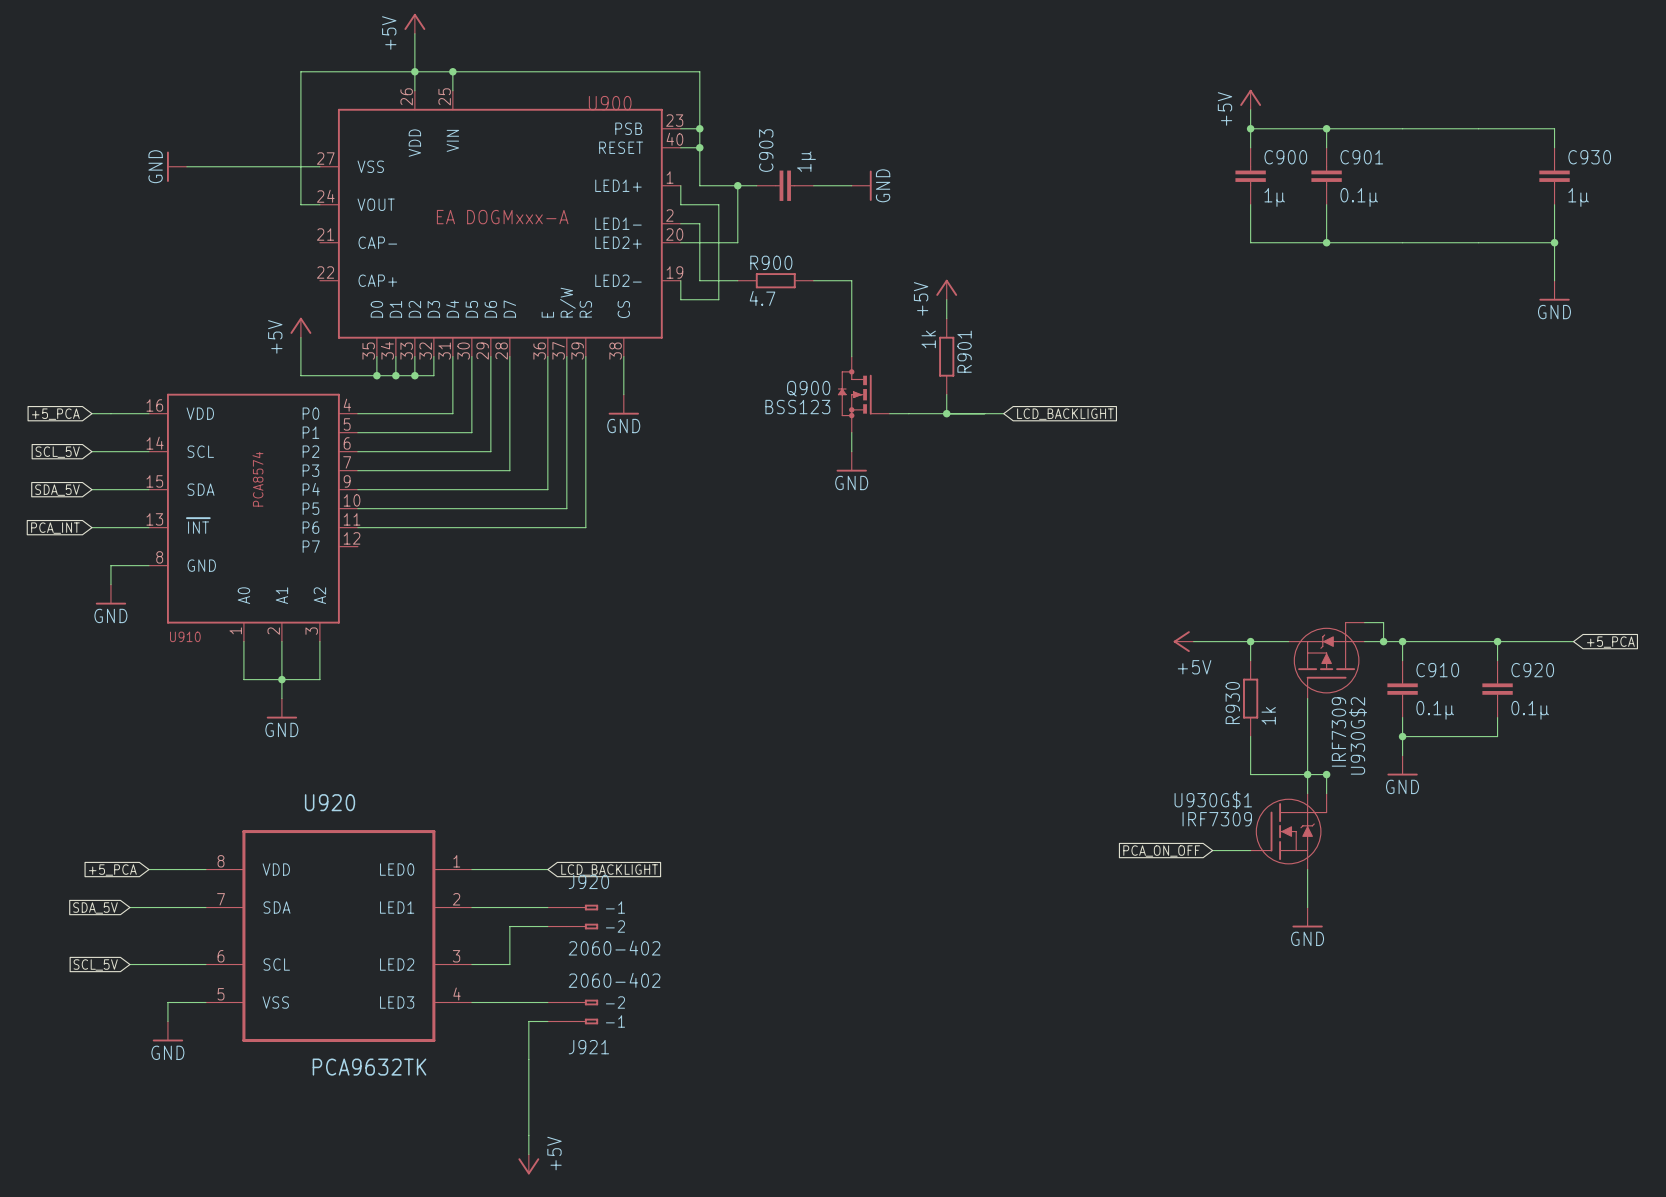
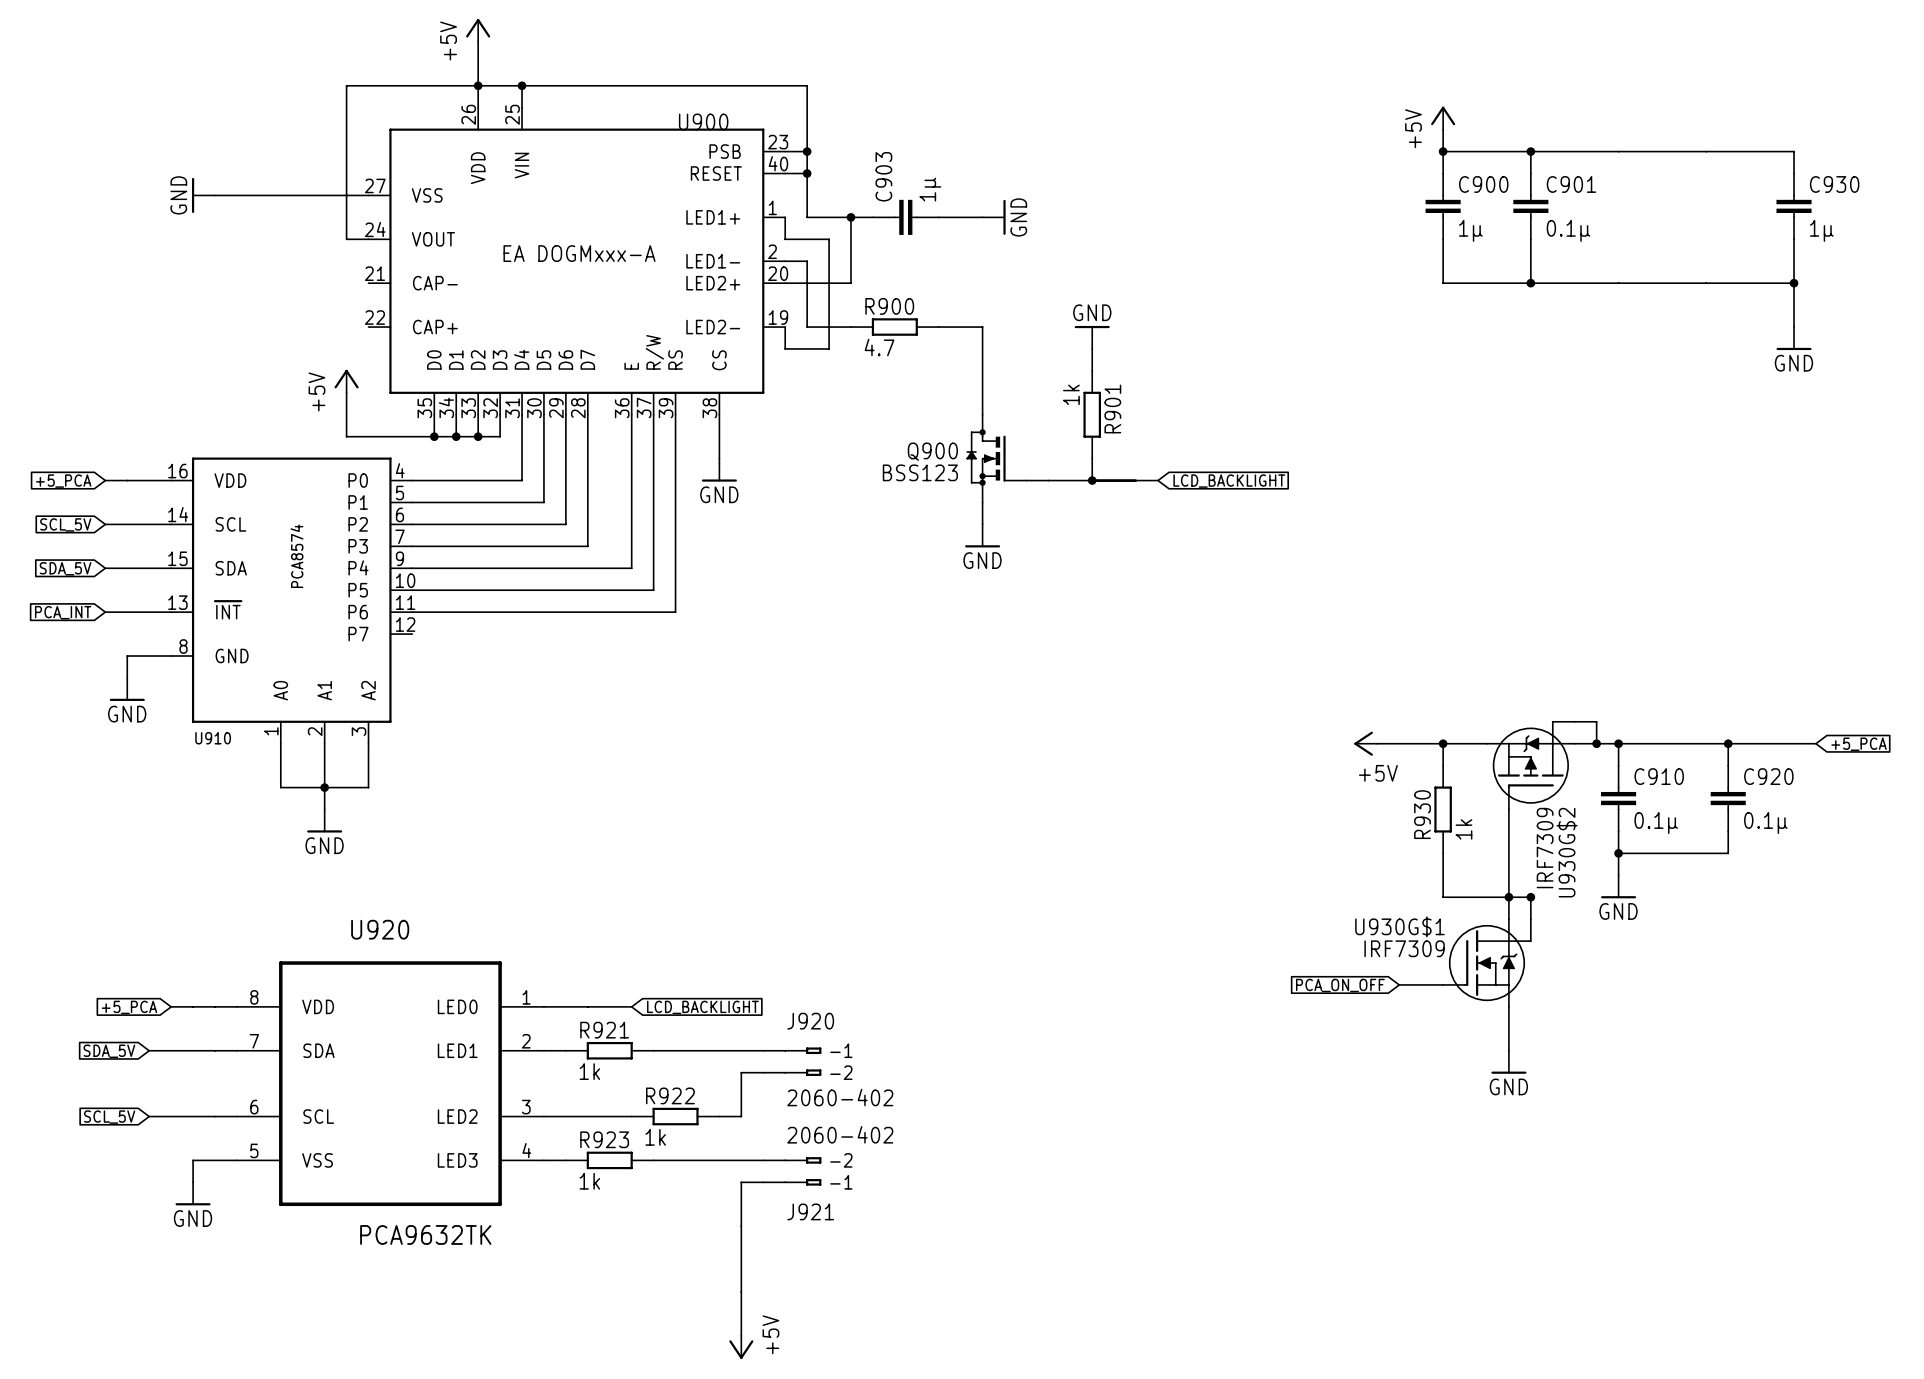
power symbol: +5V (946, 289) -> GND (1092, 337)
wire: (490, 907) (547, 907) -> none
R921: none -> 1k (609, 1050)
wire: none -> (653, 1050) (763, 1050)
J920 position: (573, 917) -> (792, 1061)
wire: (547, 926) (509, 926) (509, 964) -> (631, 1116) (587, 1116)
wire: none -> (763, 1072) (741, 1072) (741, 1116) (719, 1116)
R922: none -> 1k (675, 1116)
wire: (490, 1002) (547, 1002) -> none
R923: none -> 1k (609, 1160)
wire: none -> (653, 1160) (763, 1160)
J921 position: (573, 1012) -> (792, 1171)
wire: (547, 1021) (528, 1021) (528, 1154) -> (763, 1182) (741, 1182) (741, 1335)
power symbol position: +5V (528, 1164) -> +5V (741, 1347)

